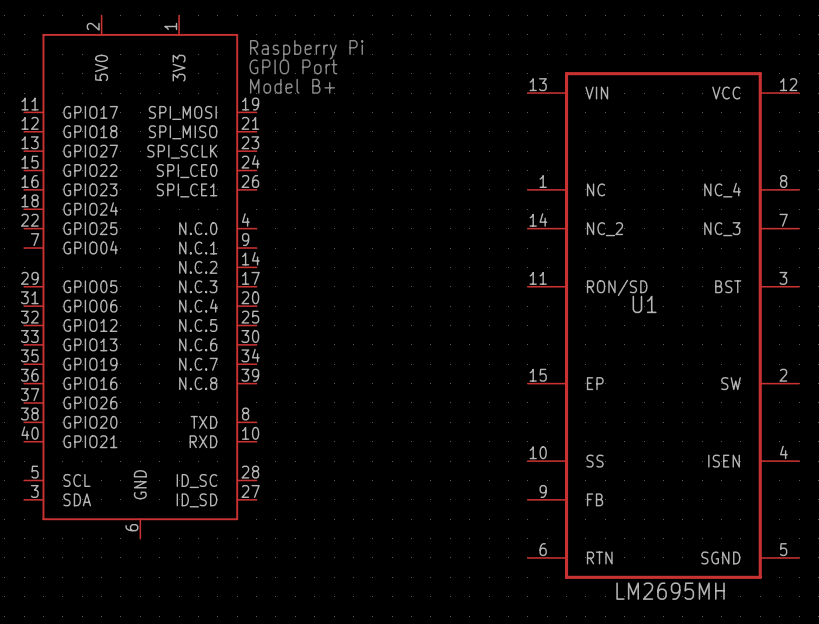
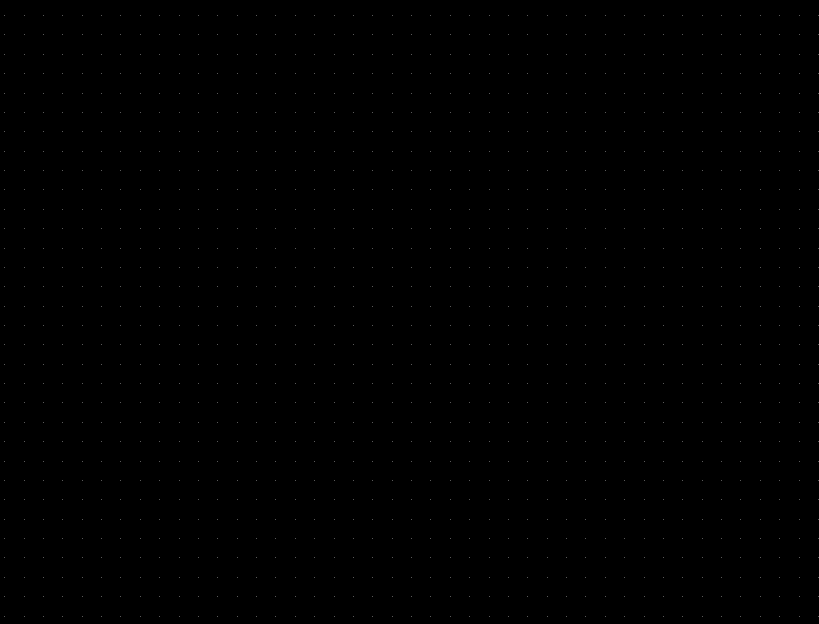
part: (140, 277) -> none
U1: LM2695MH (663, 325) -> none

